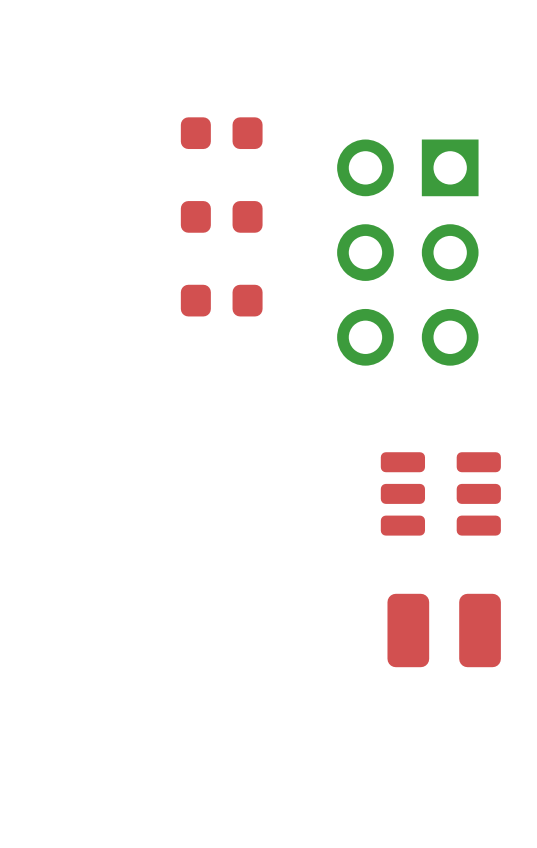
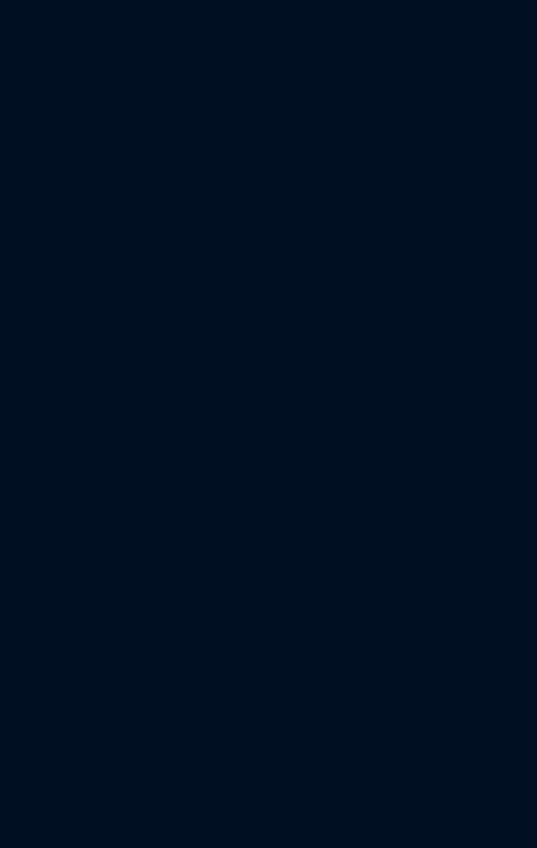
part: (221, 133) -> none
part: (221, 216) -> none
part: (407, 252) -> none
part: (221, 300) -> none
part: (440, 493) -> none
part: (444, 630) -> none

